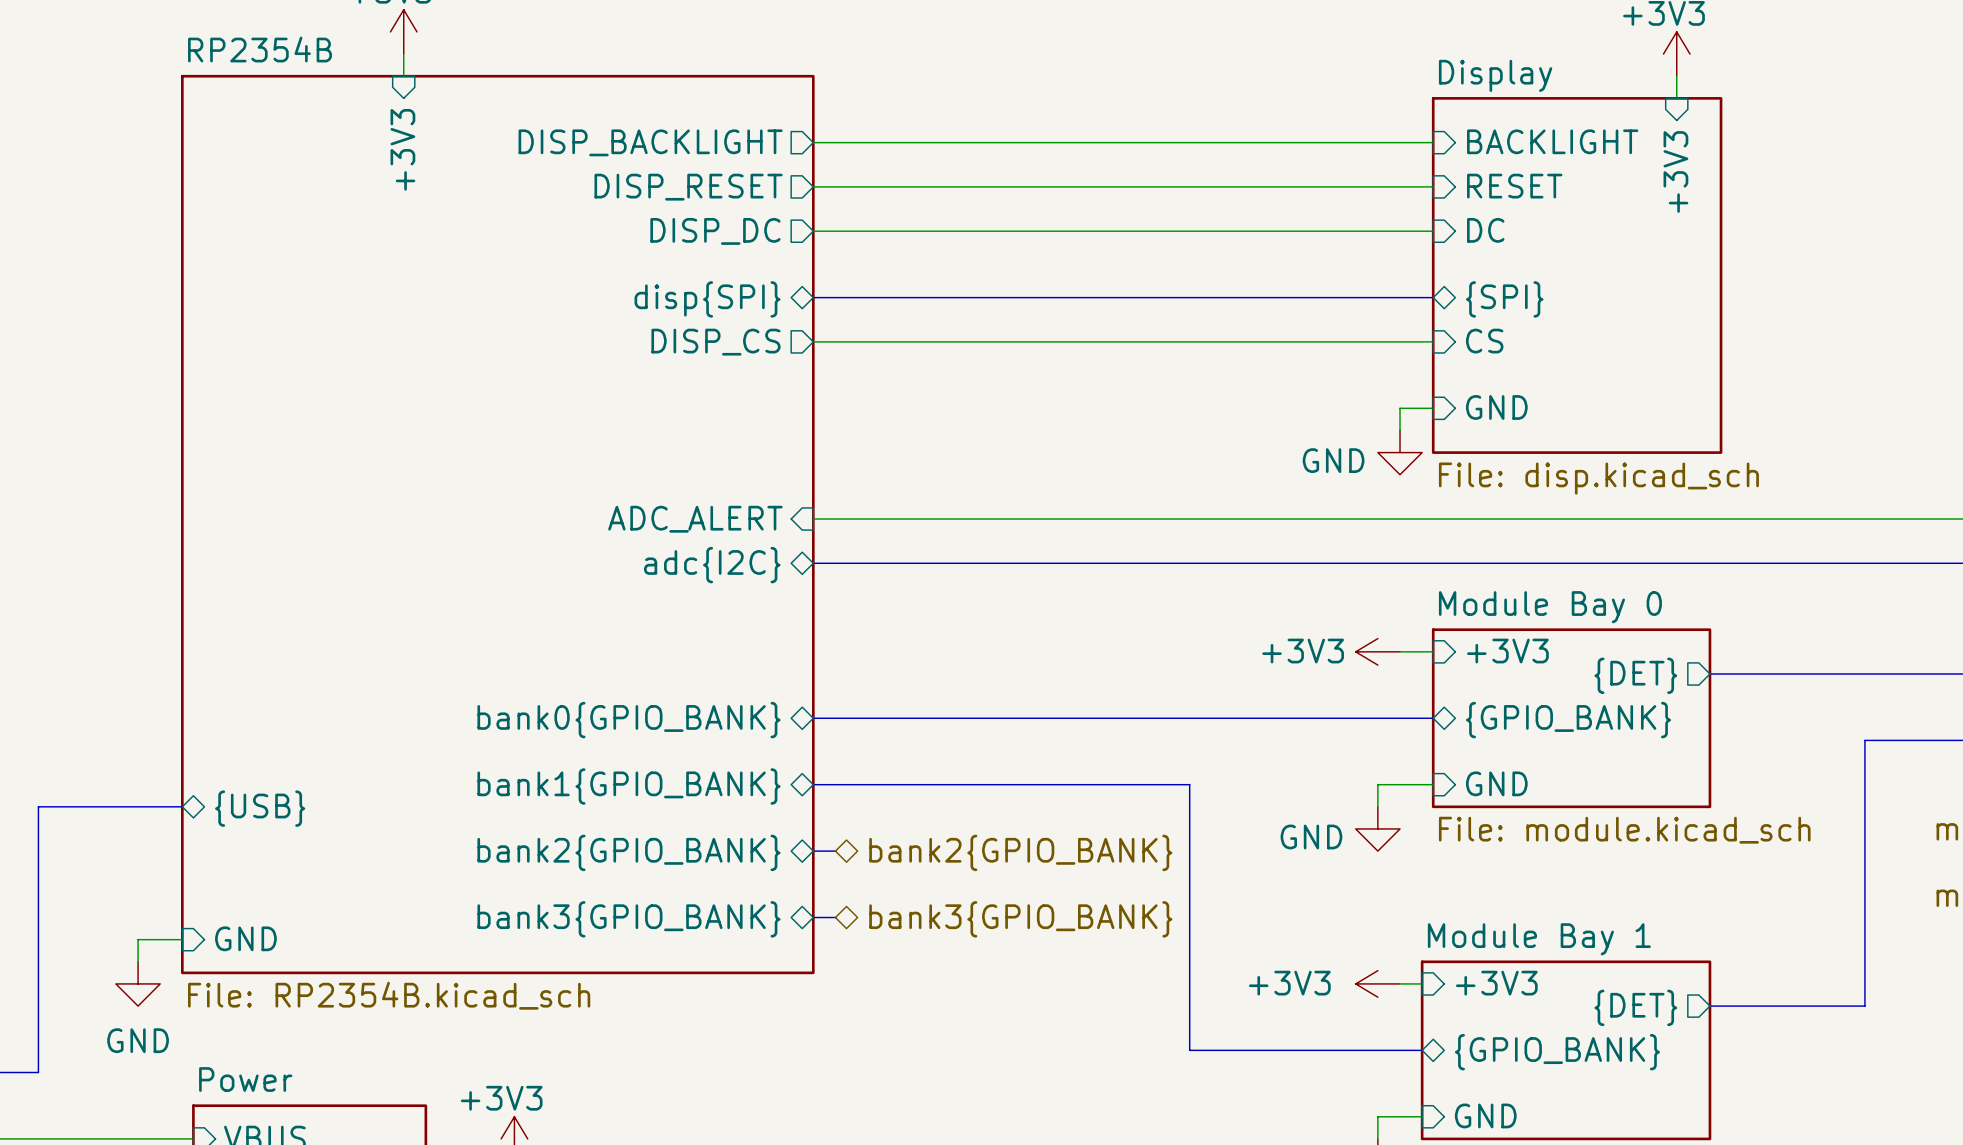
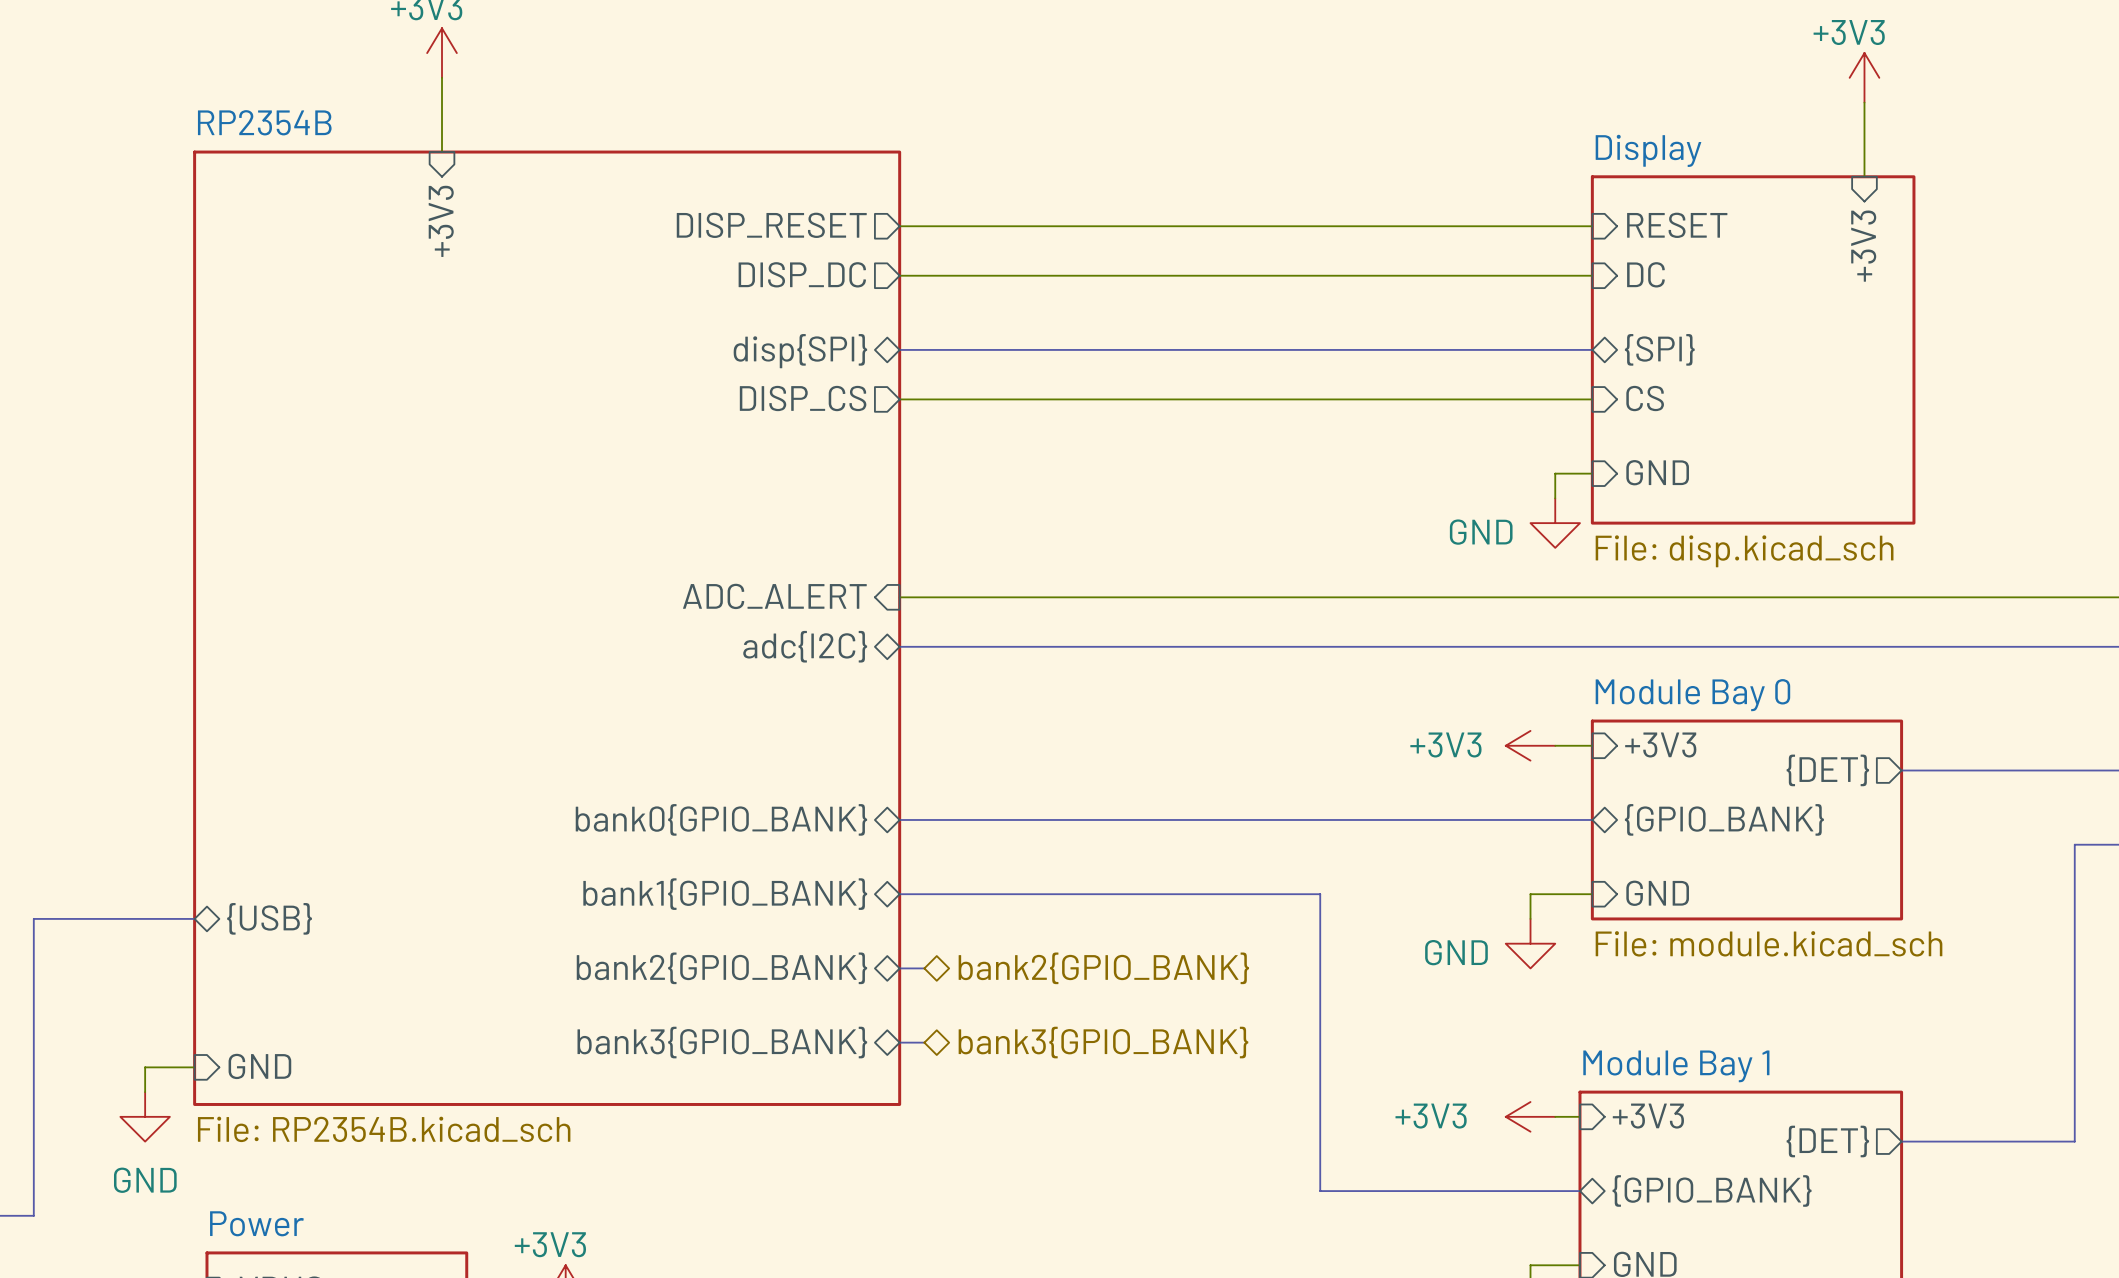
sheet RP2354B shape: [181, 74, 815, 975] -> [193, 150, 902, 1106]
wire: none -> (442, 102) (442, 152)
wire: none -> (1864, 127) (1864, 176)
sheet pin: BACKLIGHT (1552, 141) -> none
sheet pin: DISP_BACKLIGHT (650, 142) -> none
wire: (813, 142) (1433, 142) -> none
sheet pin position: +3V3 (402, 149) -> +3V3 (441, 221)
sheet pin position: +3V3 (1675, 171) -> +3V3 (1863, 246)
sheet Display: File: disp.kicad_sch (1577, 275) -> none
sheet Display: none -> File: disp.kicad_sch (1753, 349)

